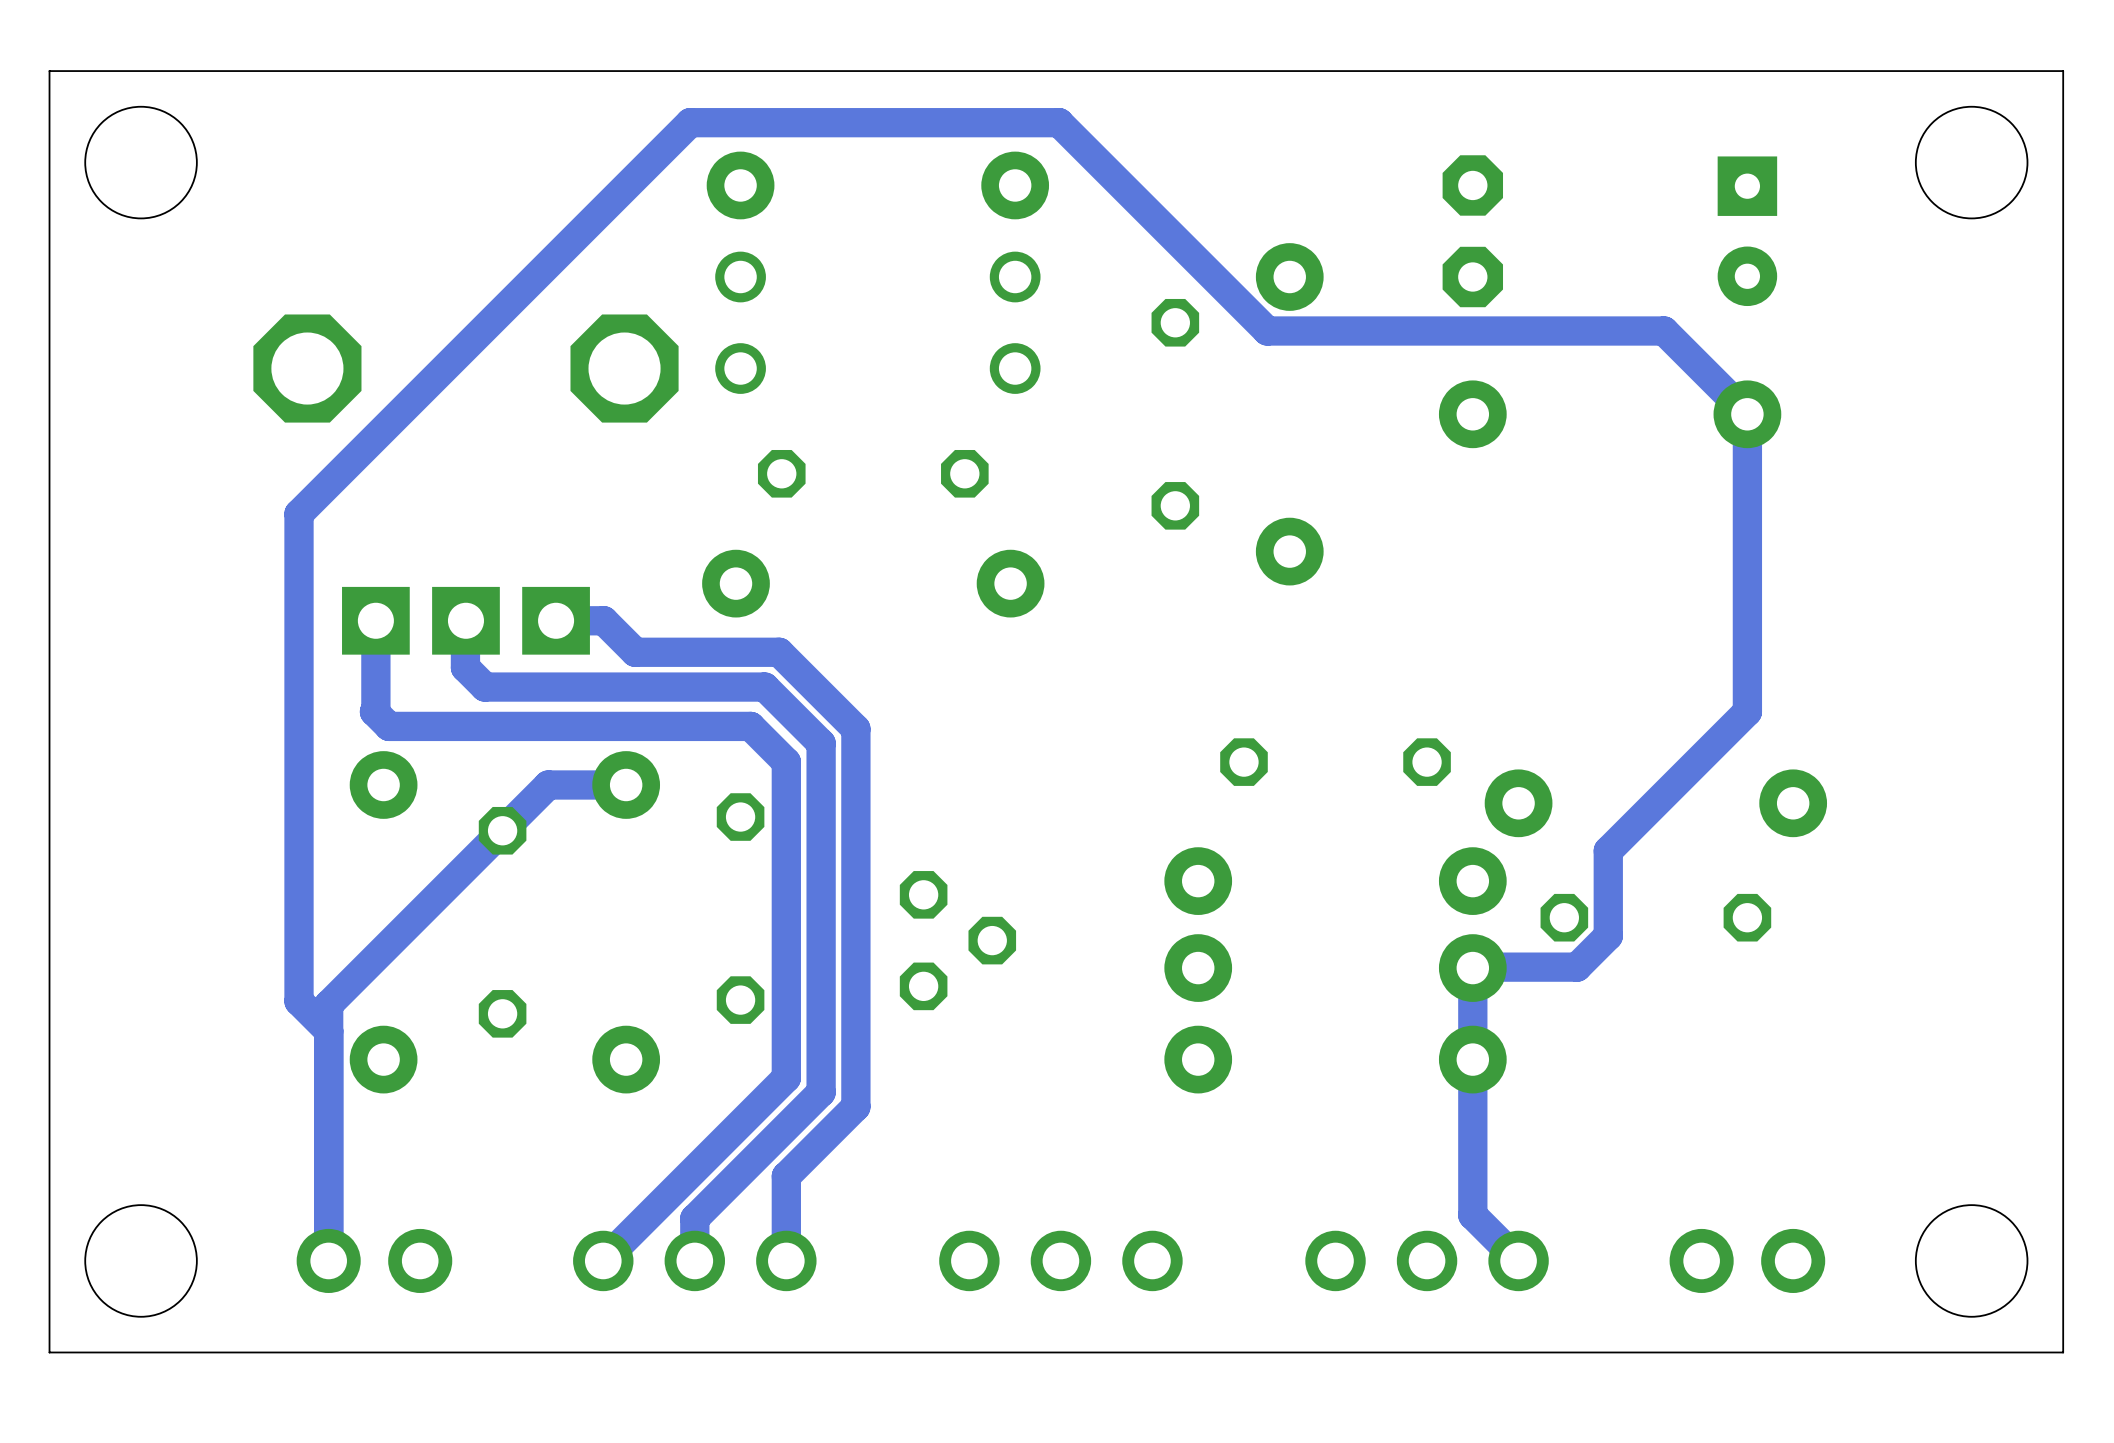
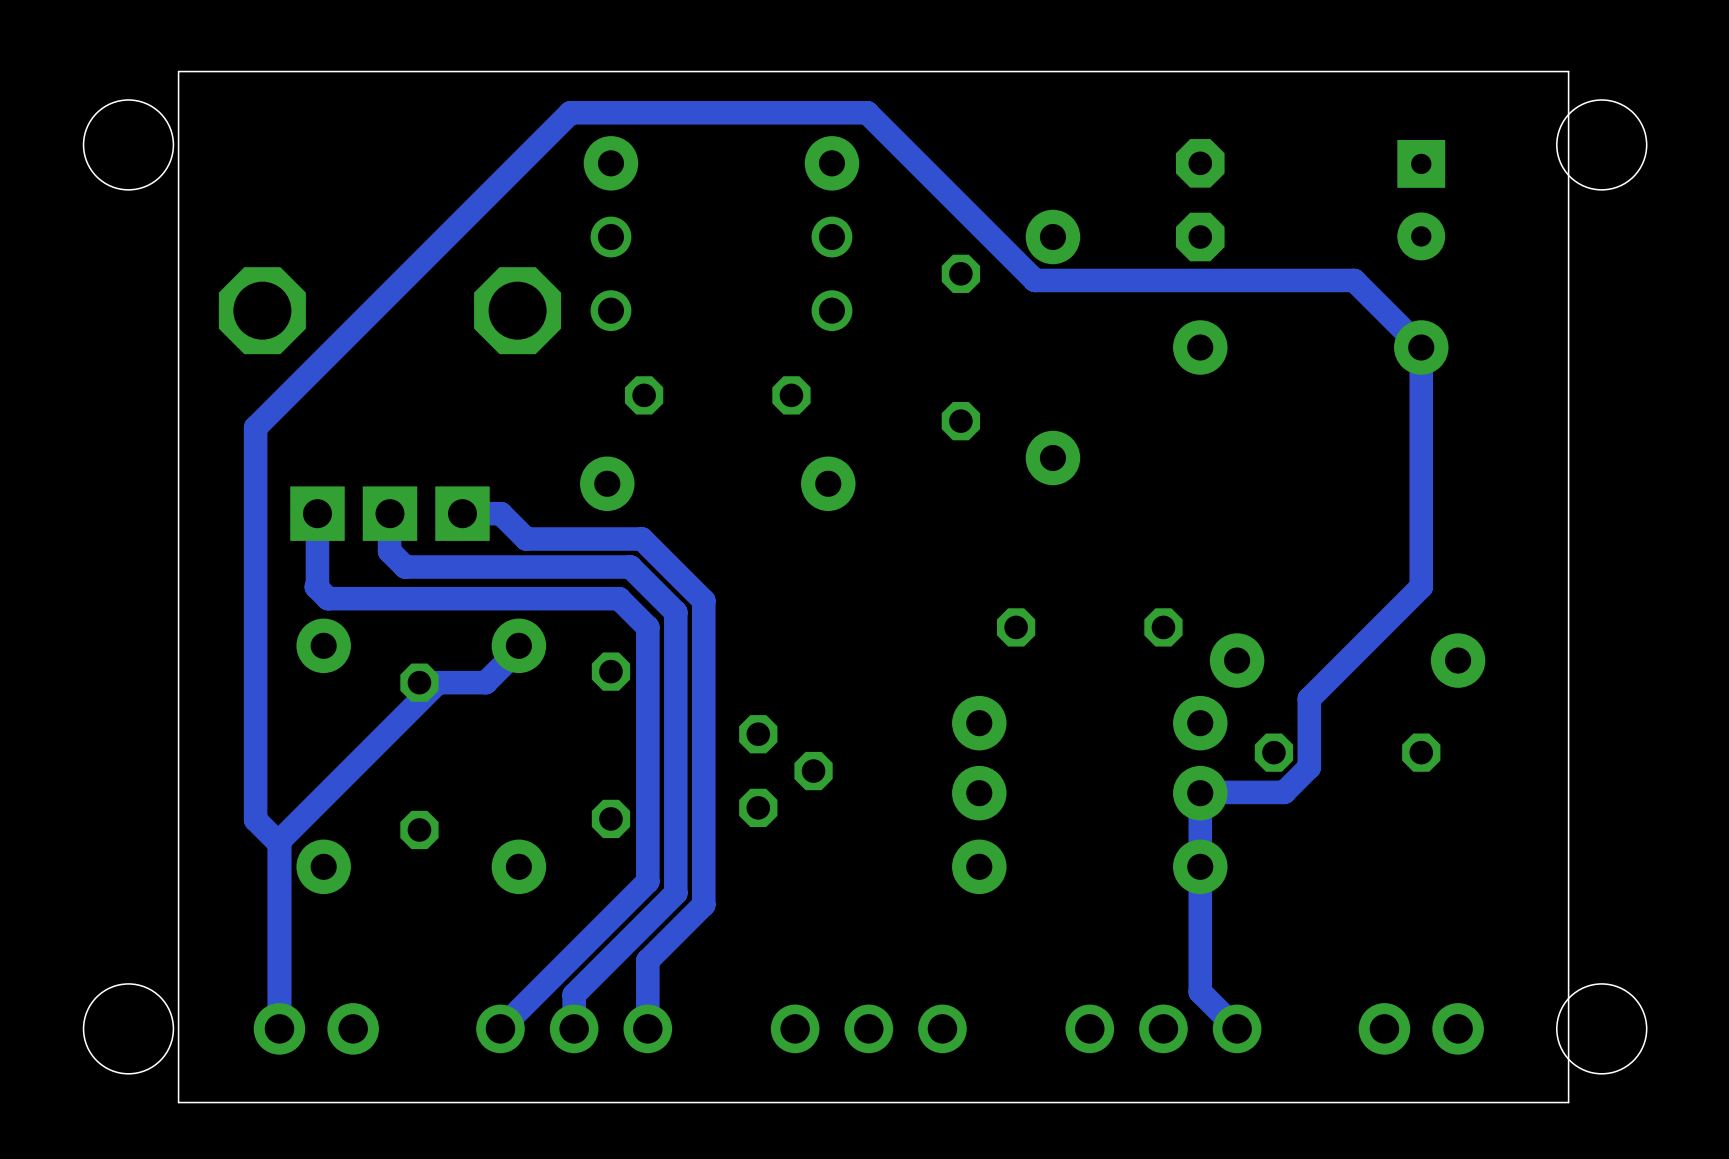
track: (626, 784) (548, 784) (328, 1004) (328, 1027) -> (526, 642) (485, 682) (437, 682) (279, 841)
board edge: (1930, 1352) (2063, 1352) (2063, 71) (49, 71) (49, 1352) (203, 1352) -> (1568, 1102) (1568, 71) (178, 71) (178, 1102)

